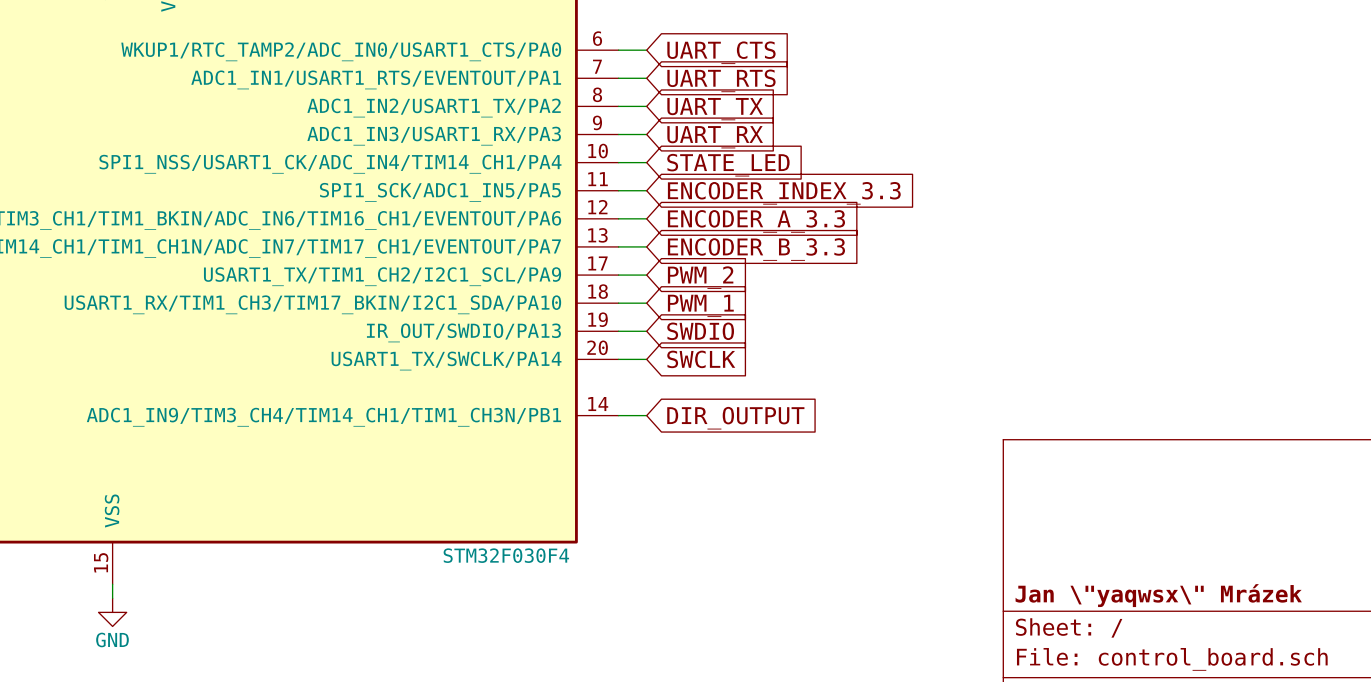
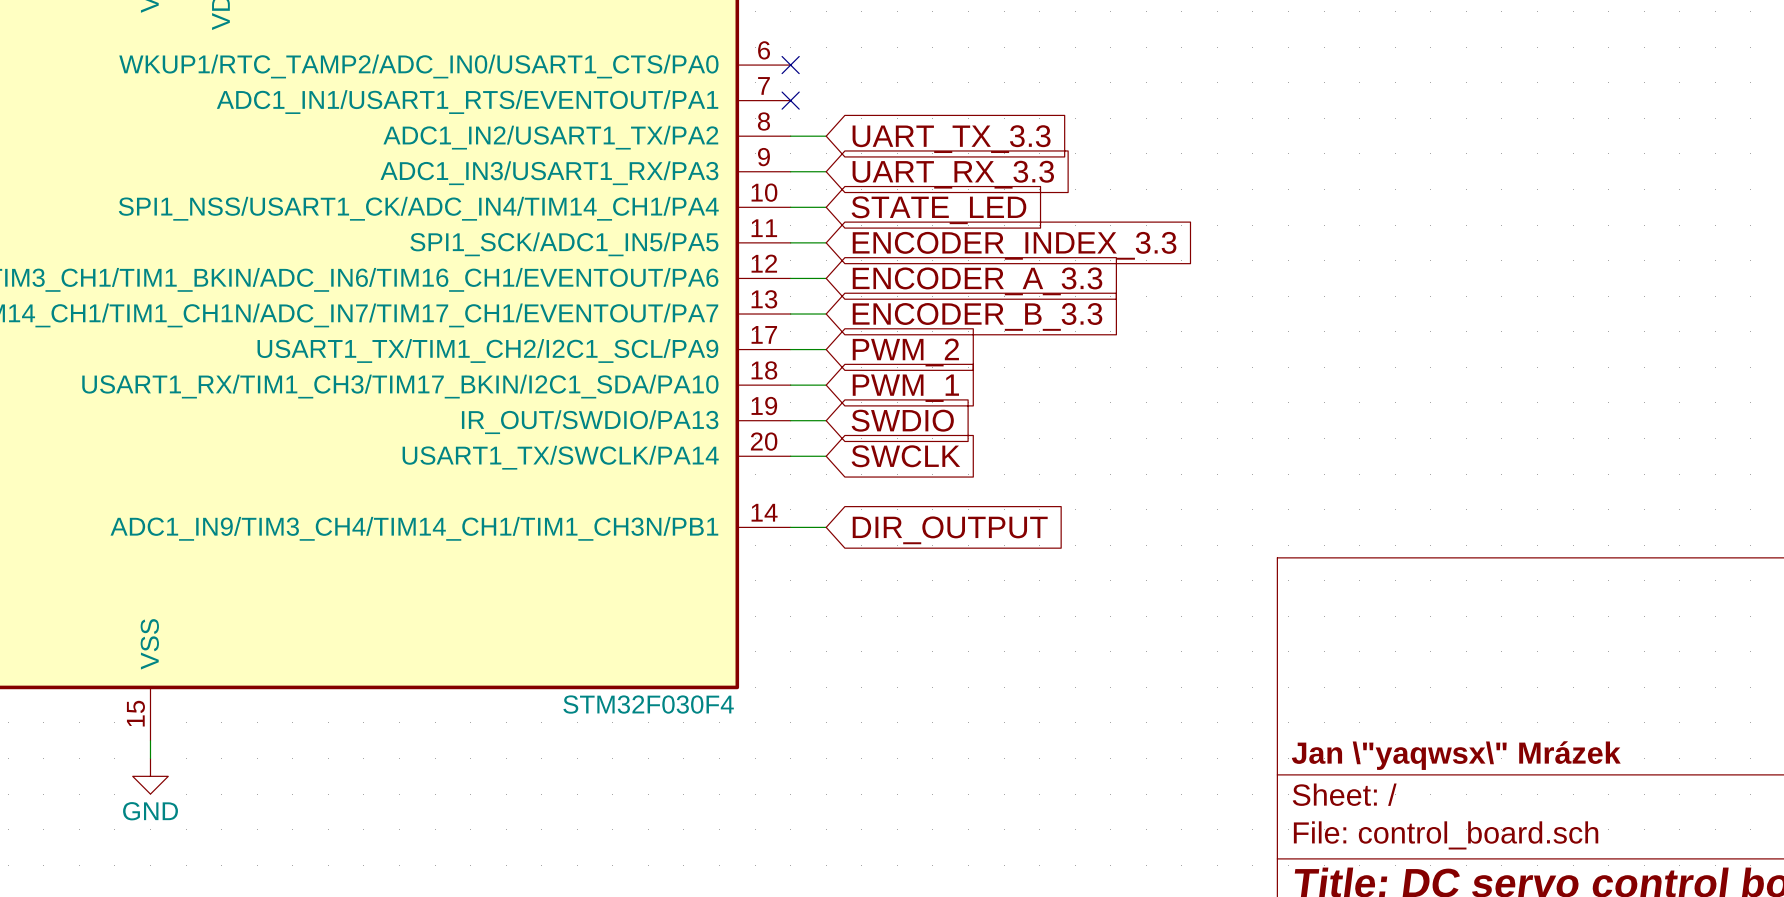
wire: (618, 50) (646, 50) -> none
no-connect mark: none -> (790, 65)
global label: UART_CTS (721, 52) -> none
wire: (618, 78) (646, 78) -> none
no-connect mark: none -> (790, 100)
global label: UART_RTS (721, 80) -> none
global label: UART_TX (715, 109) -> UART_TX_3.3 (951, 139)
global label: UART_RX (715, 137) -> UART_RX_3.3 (953, 174)

